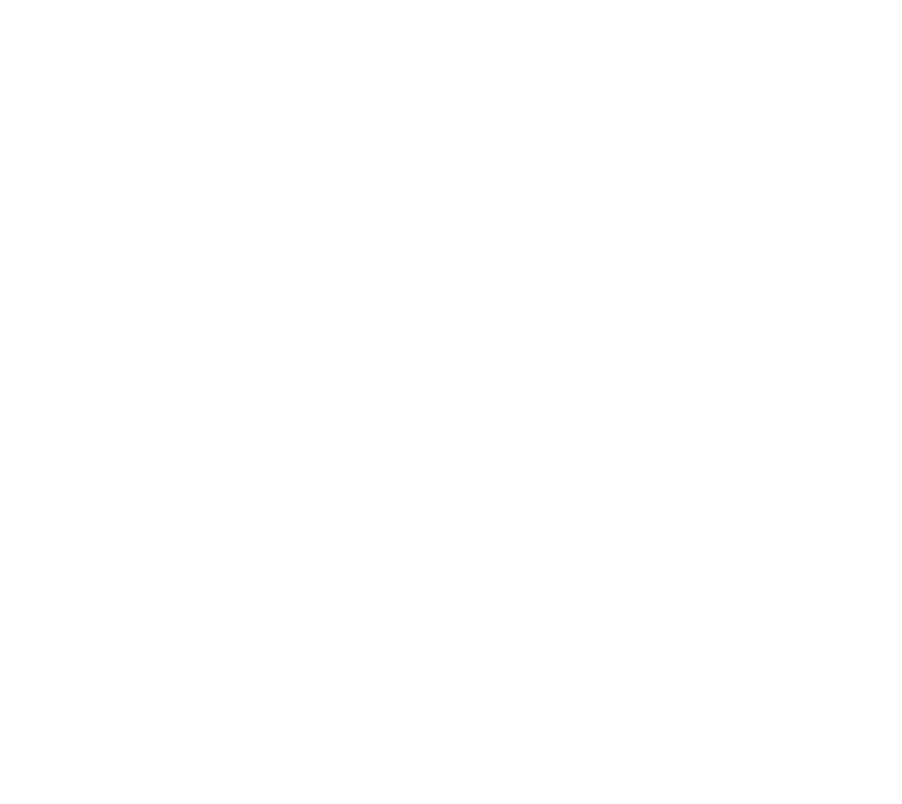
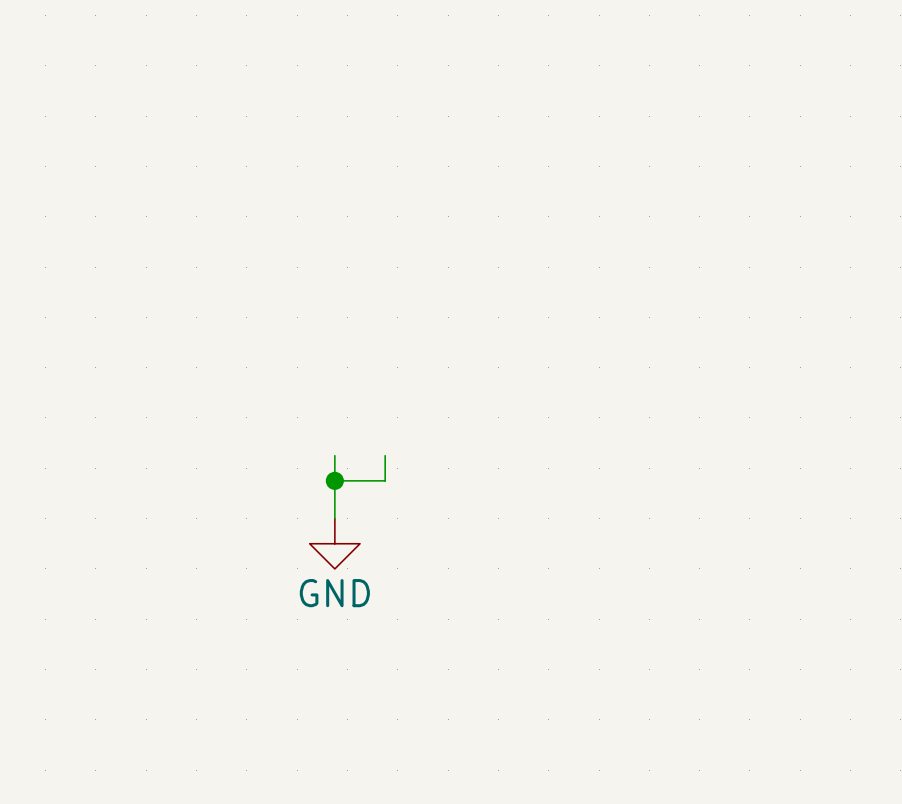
wire: none -> (334, 455) (334, 518)
wire: none -> (385, 455) (385, 480) (334, 480)
junction: none -> (334, 480)
power symbol: none -> GND (334, 543)

